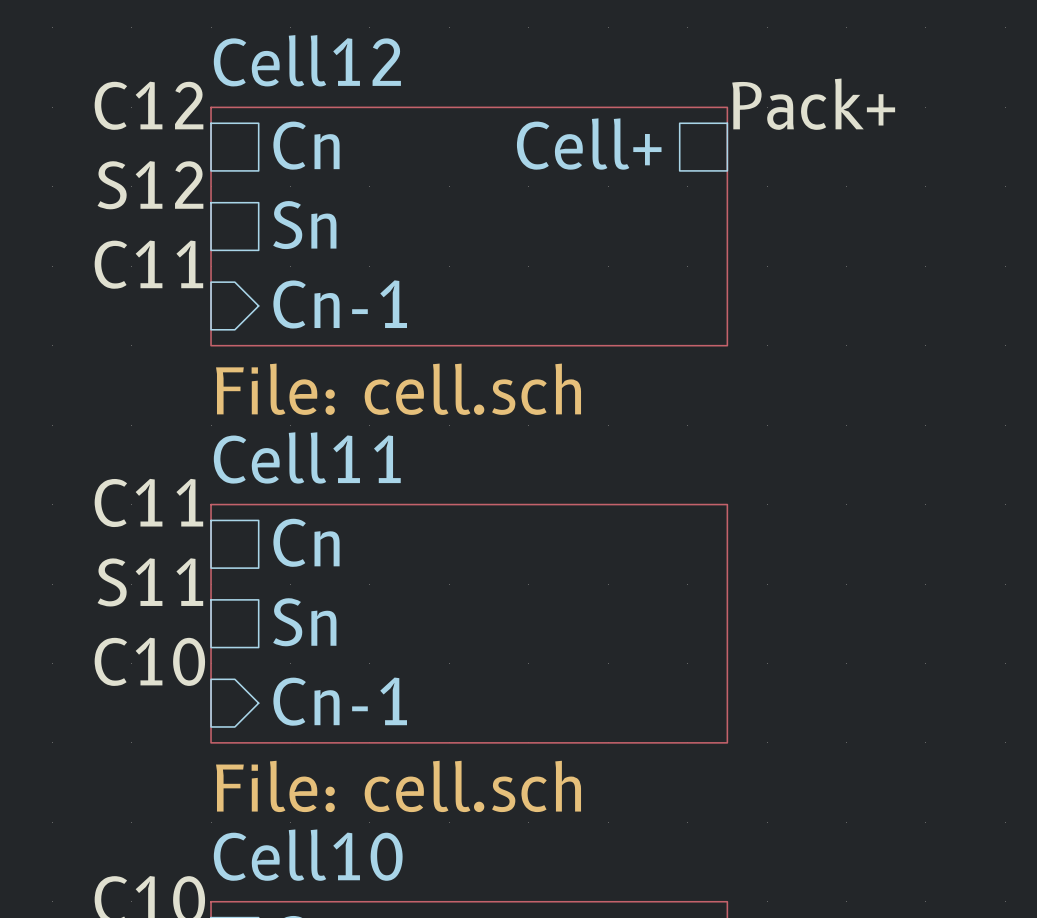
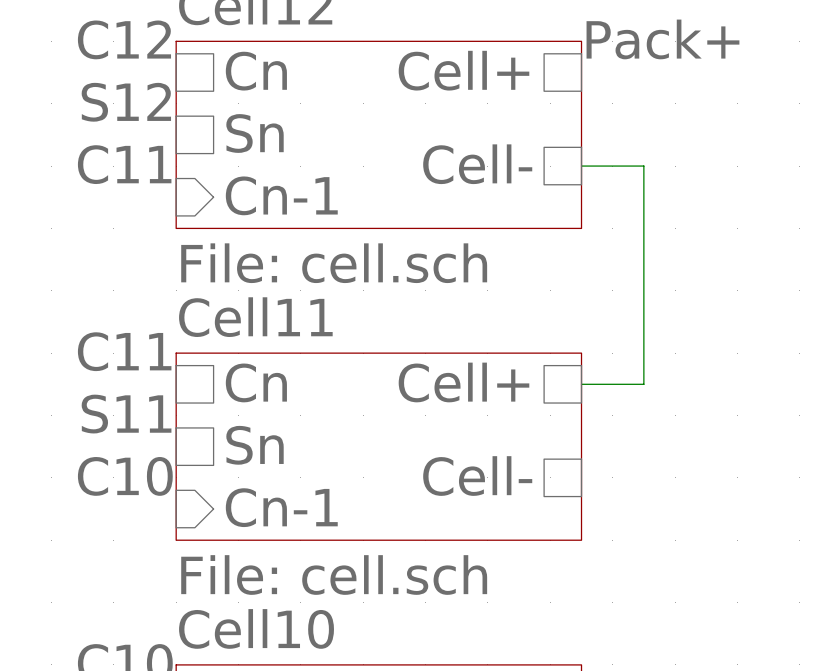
sheet pin: none -> Cell- (477, 164)
wire: none -> (581, 166) (643, 166) (643, 384) (581, 384)
sheet pin: none -> Cell+ (463, 382)
sheet pin: none -> Cell- (477, 476)

